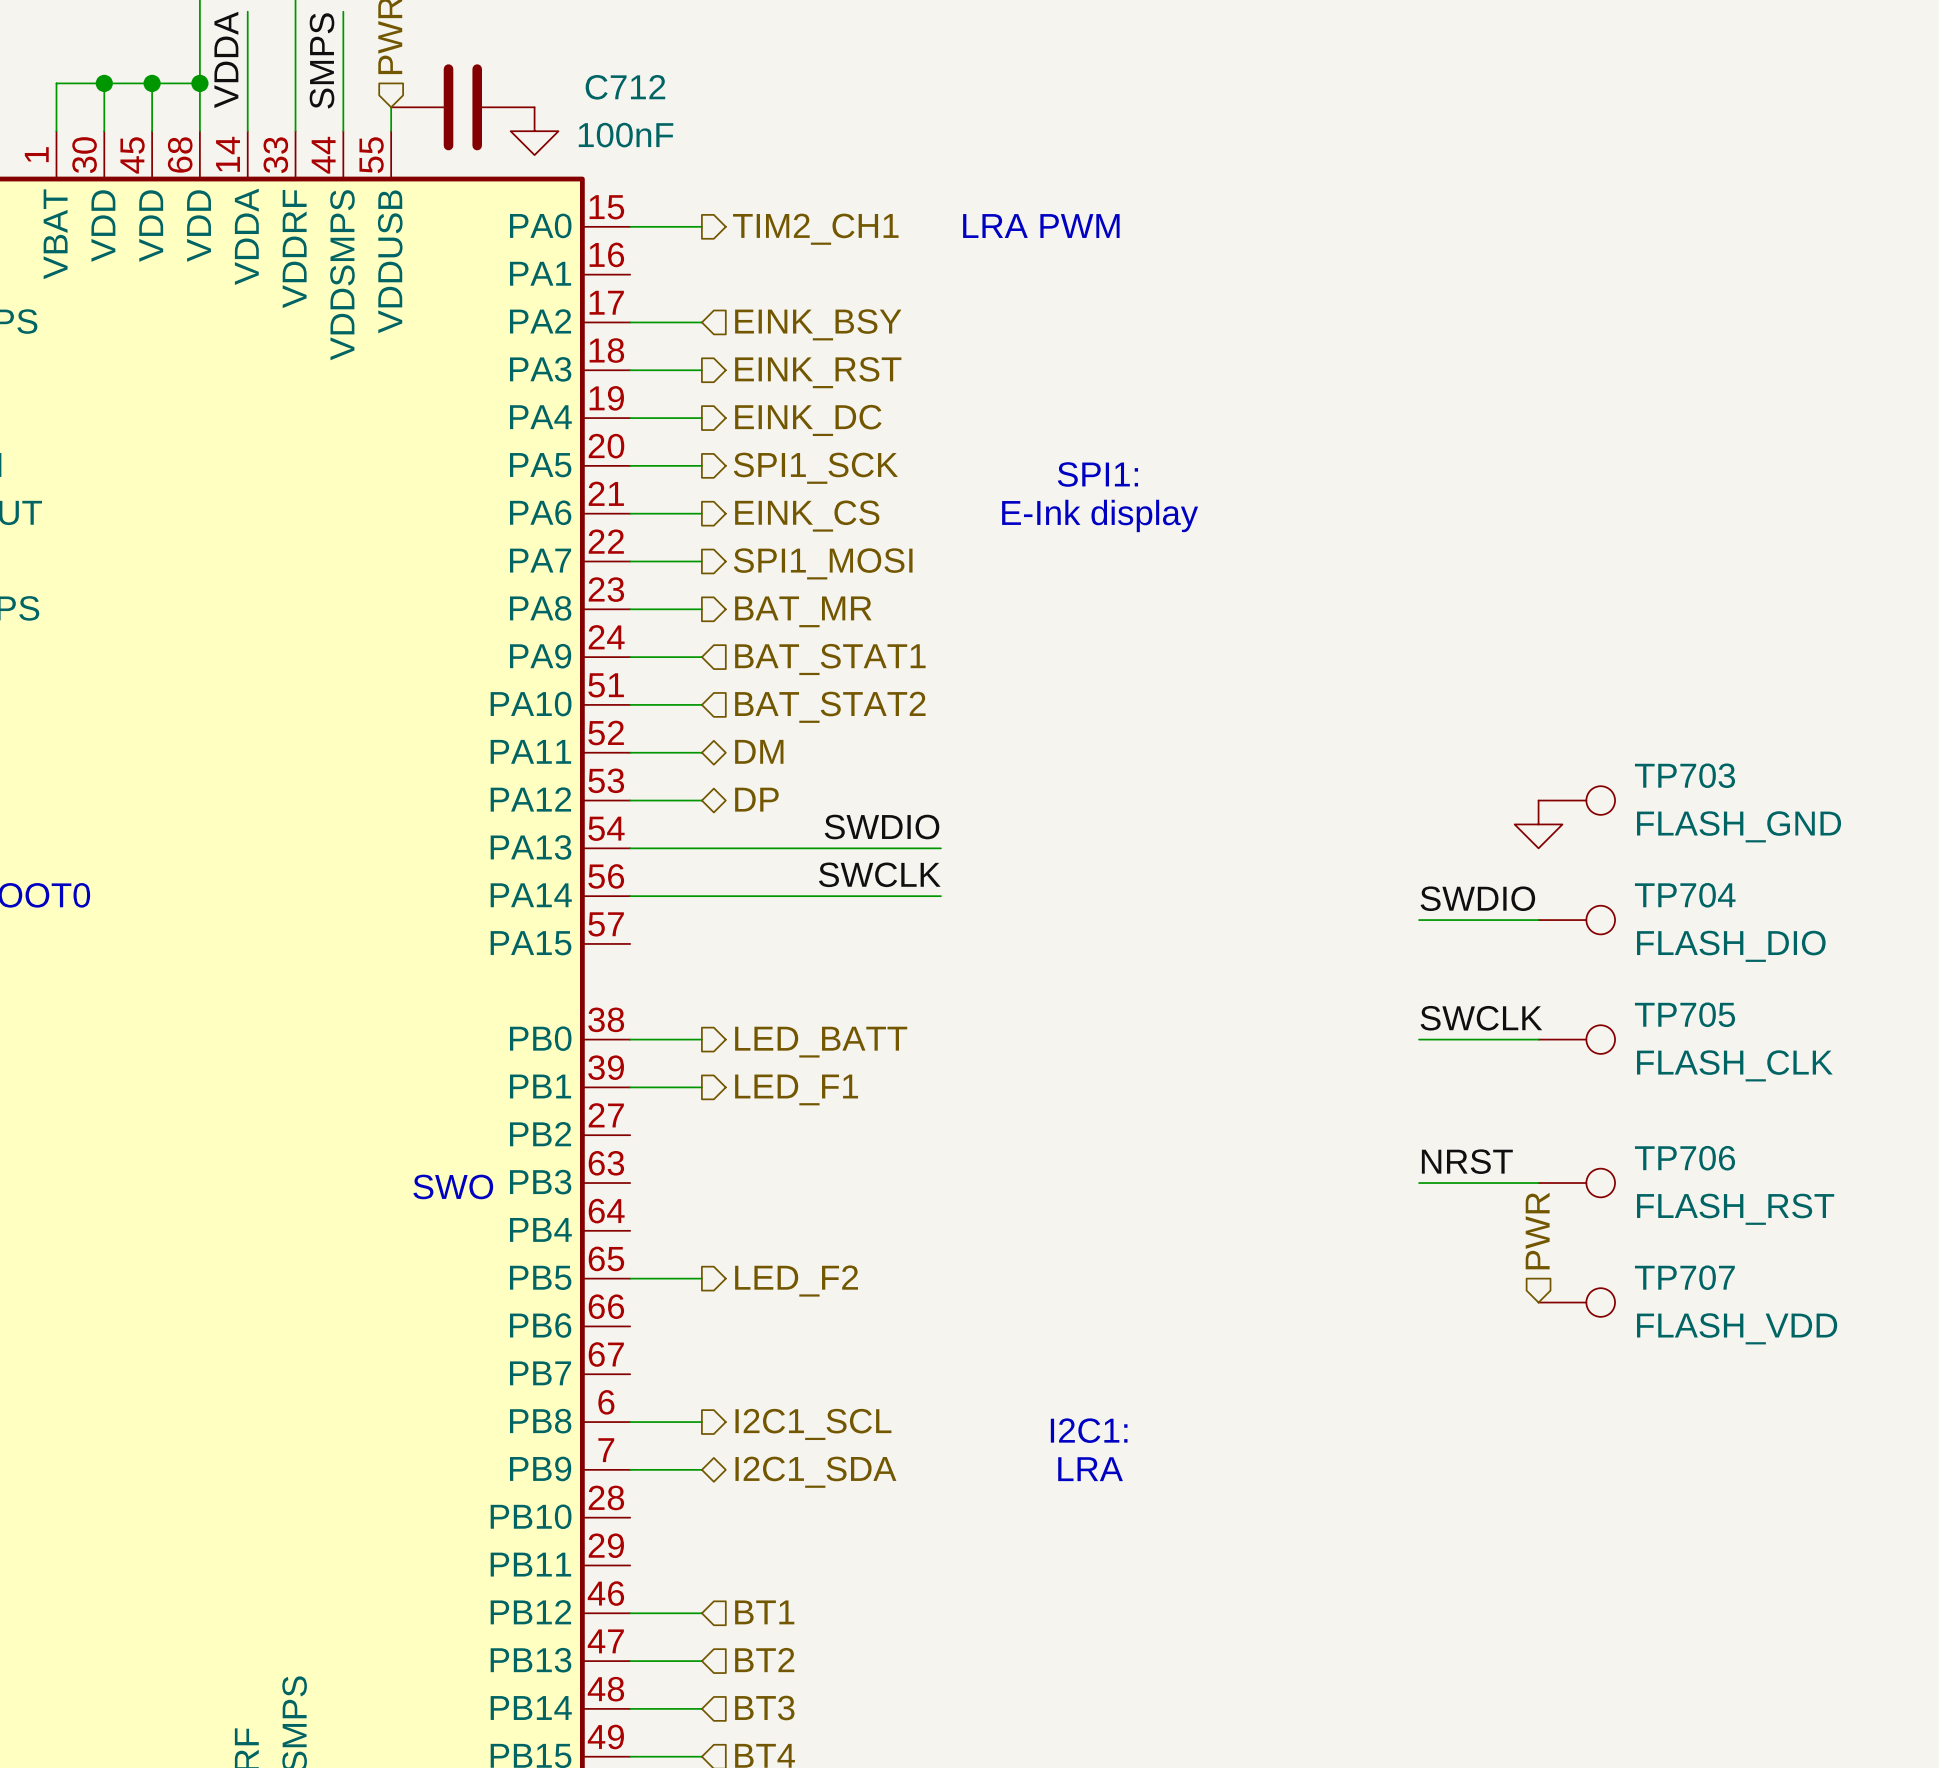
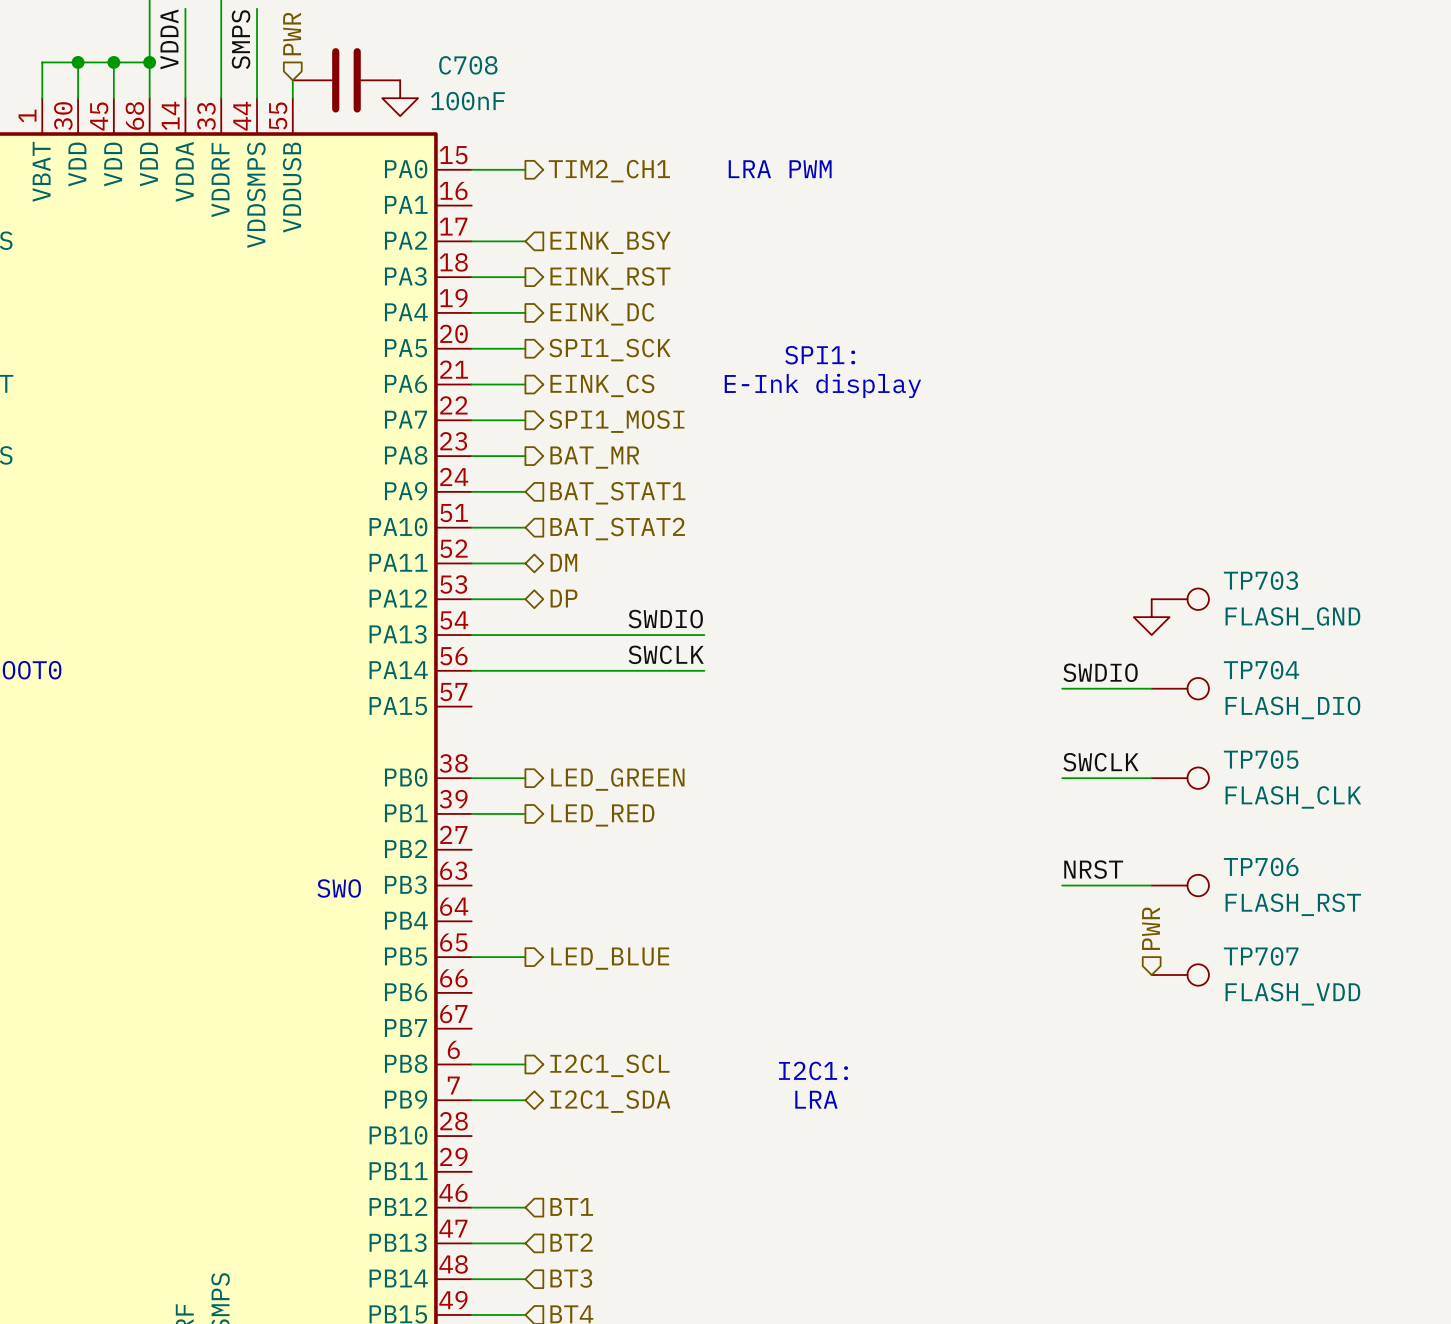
C712 name: C712 (625, 87) -> C708 (468, 65)
hierarchical label: LED_BATT (821, 1042) -> LED_GREEN (617, 779)
hierarchical label: LED_F1 (796, 1089) -> LED_RED (602, 815)
hierarchical label: LED_F2 (796, 1281) -> LED_BLUE (610, 958)

